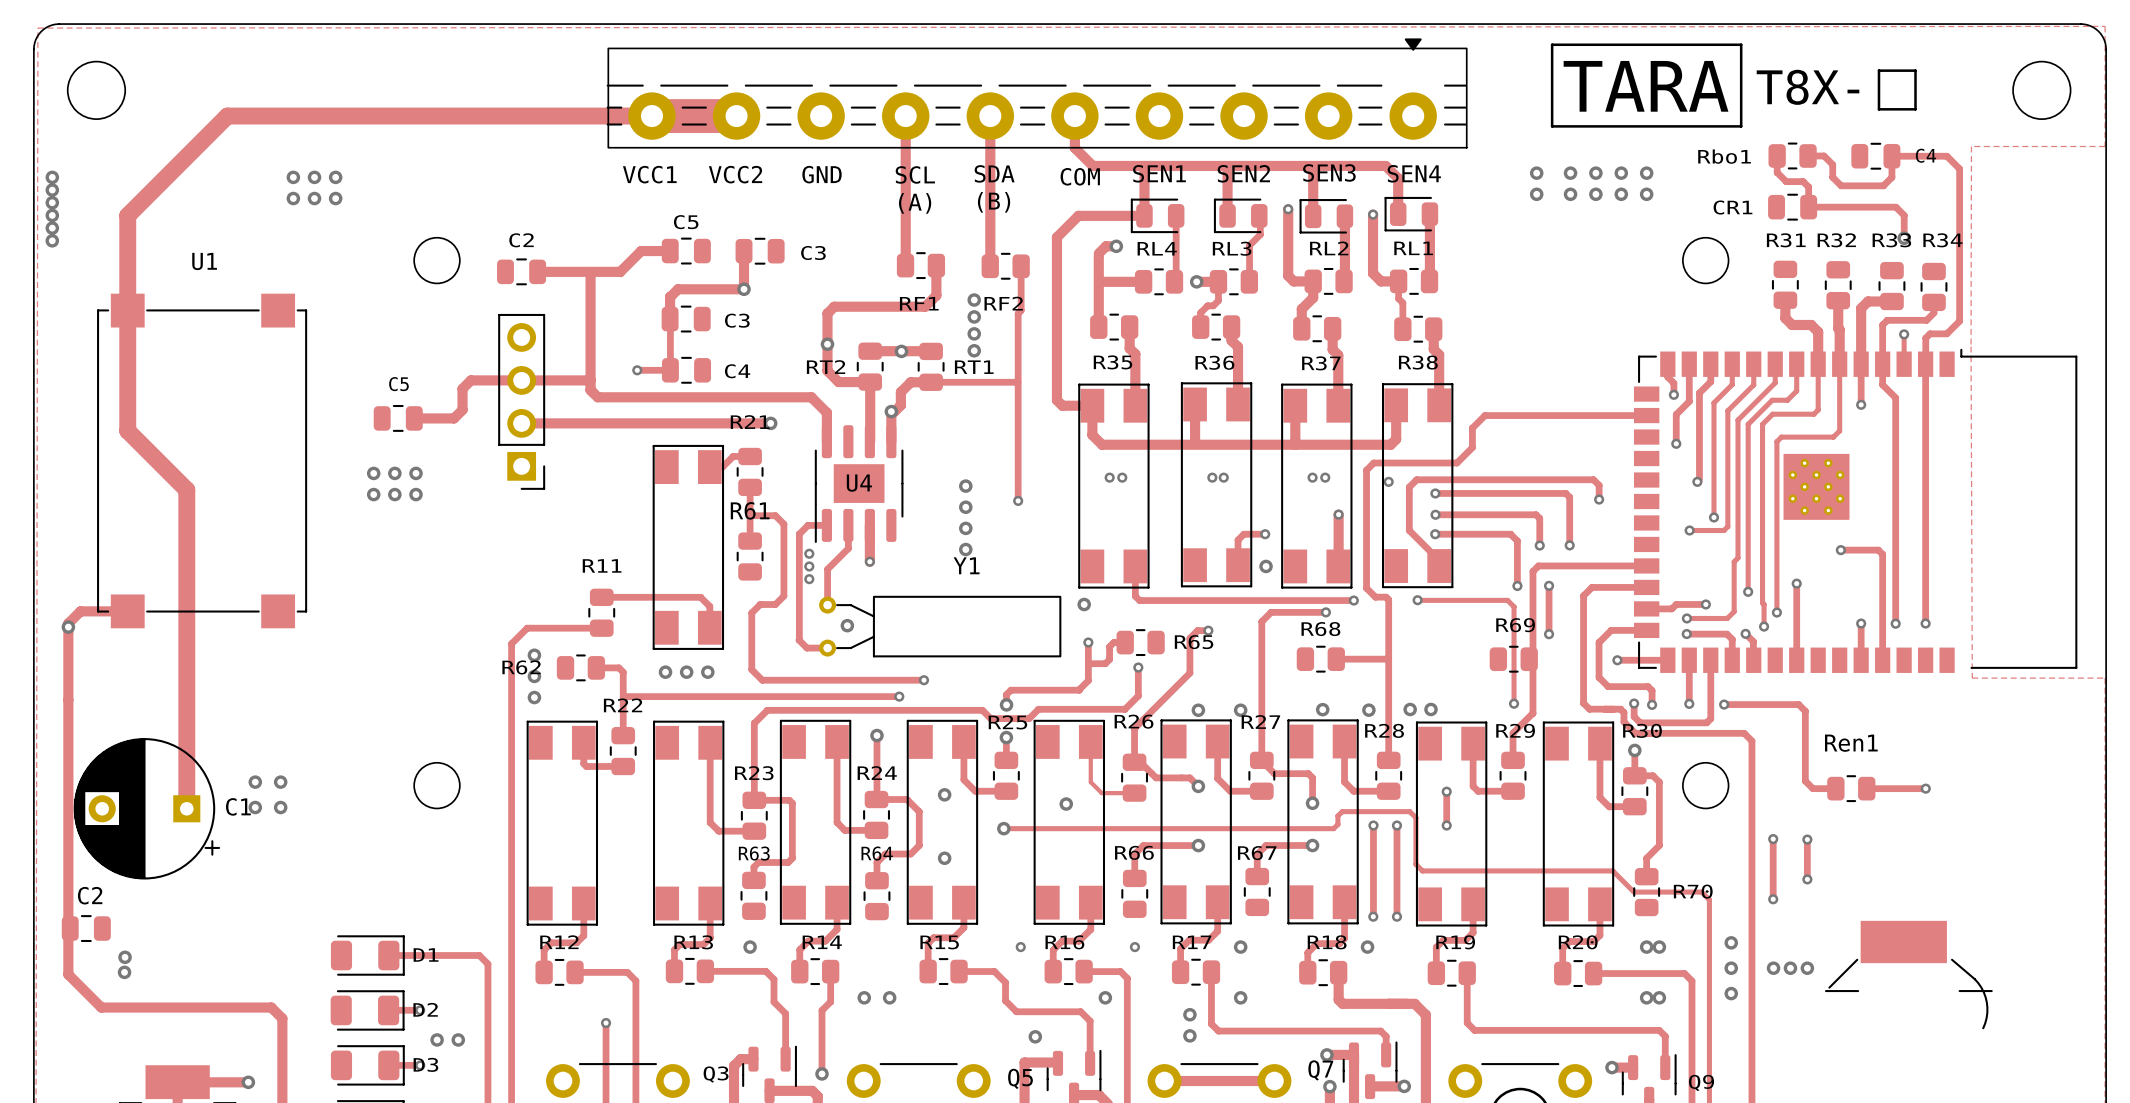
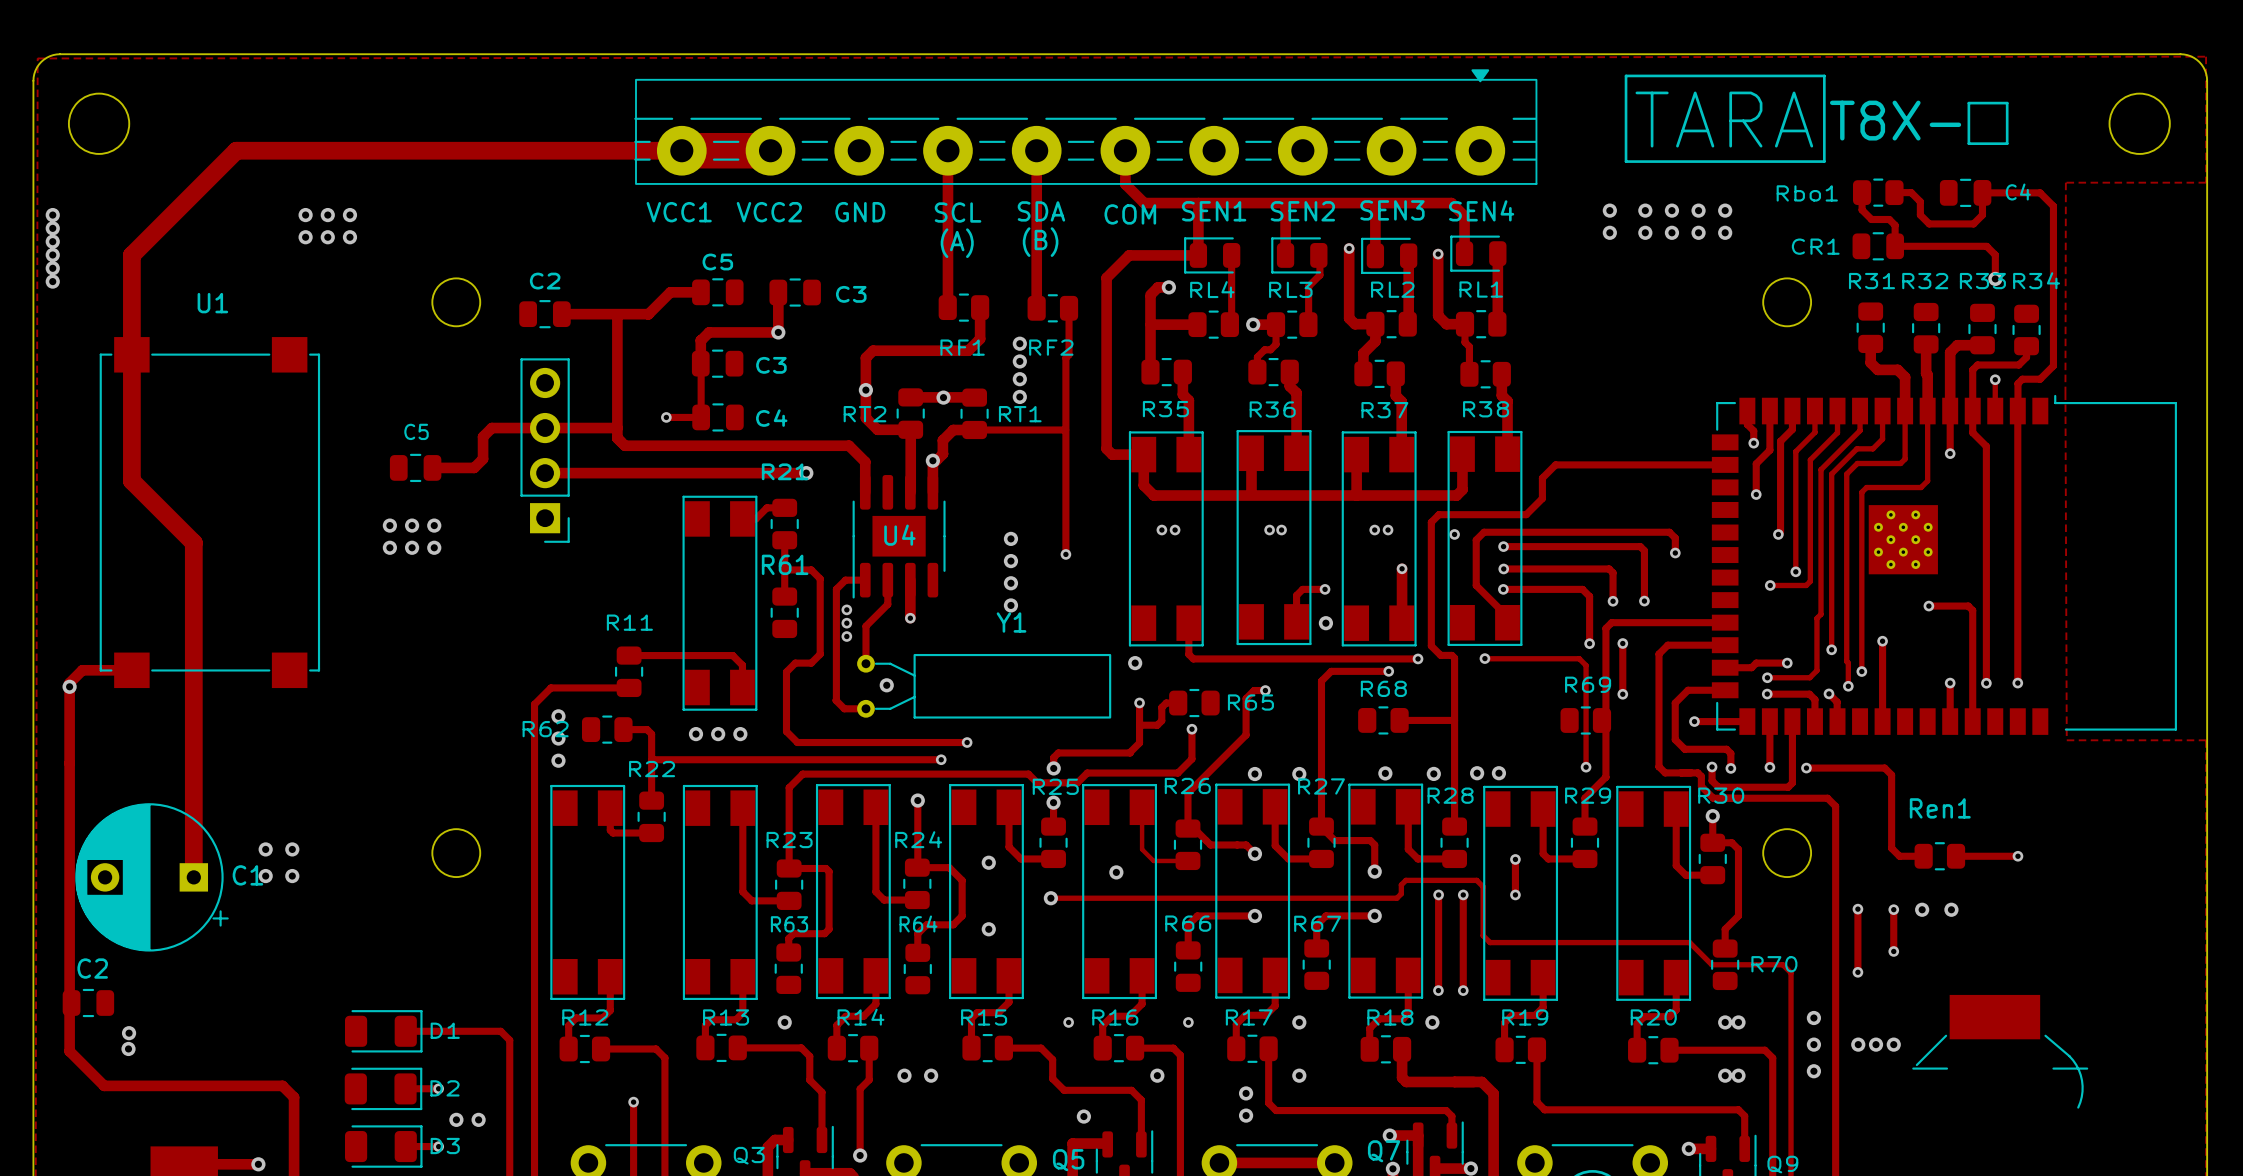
via: none -> (1922, 909)
via: none -> (1951, 909)

